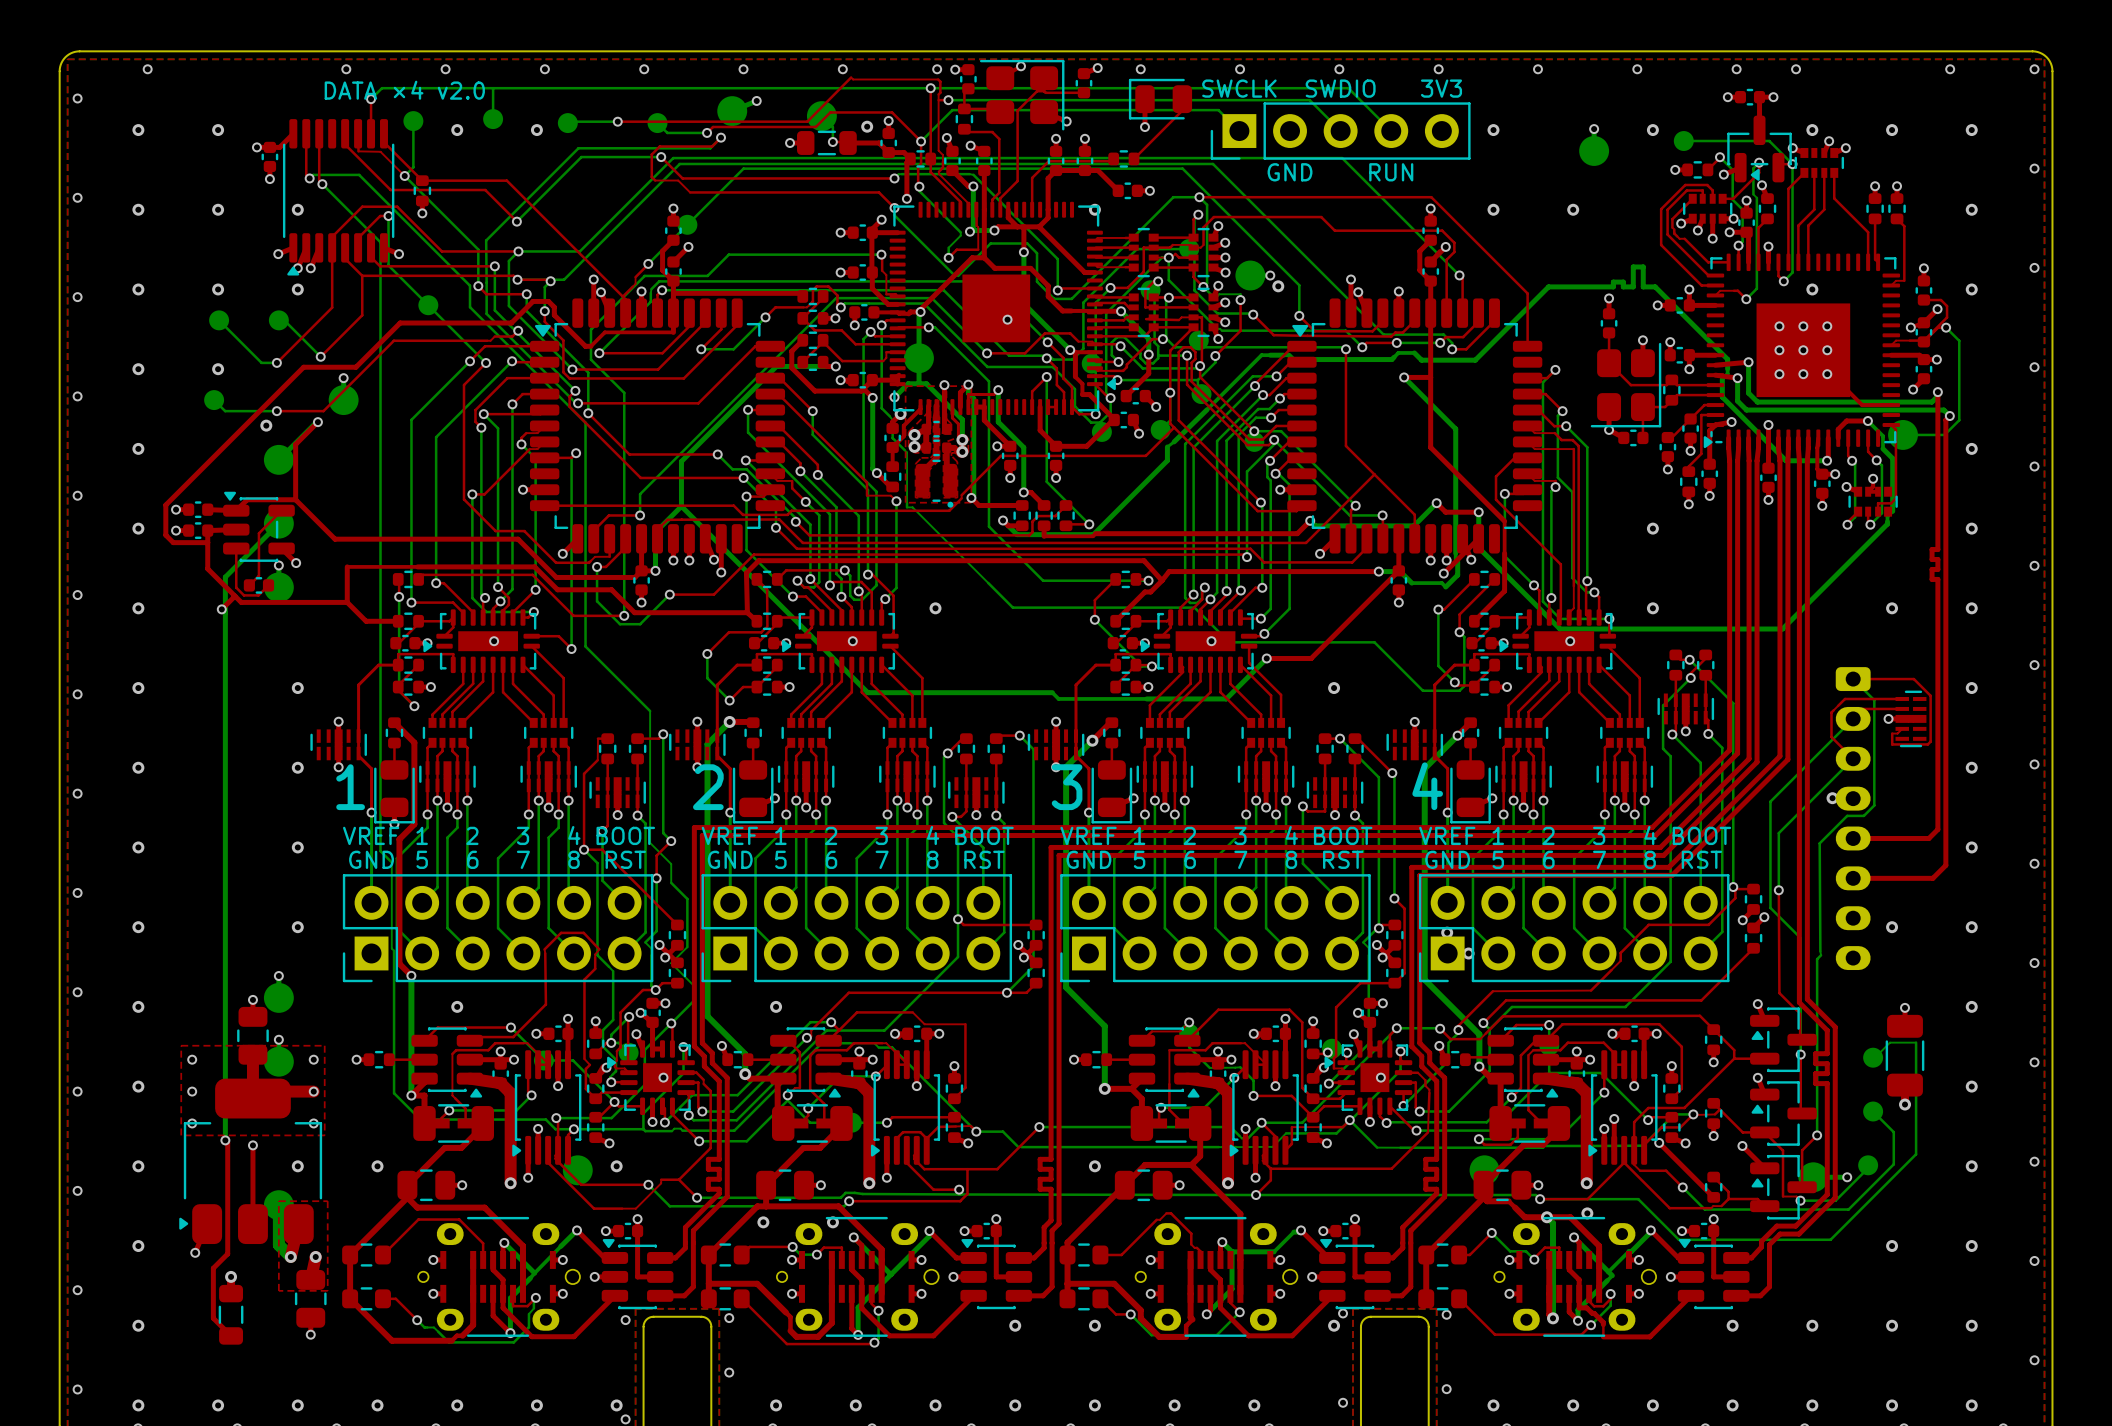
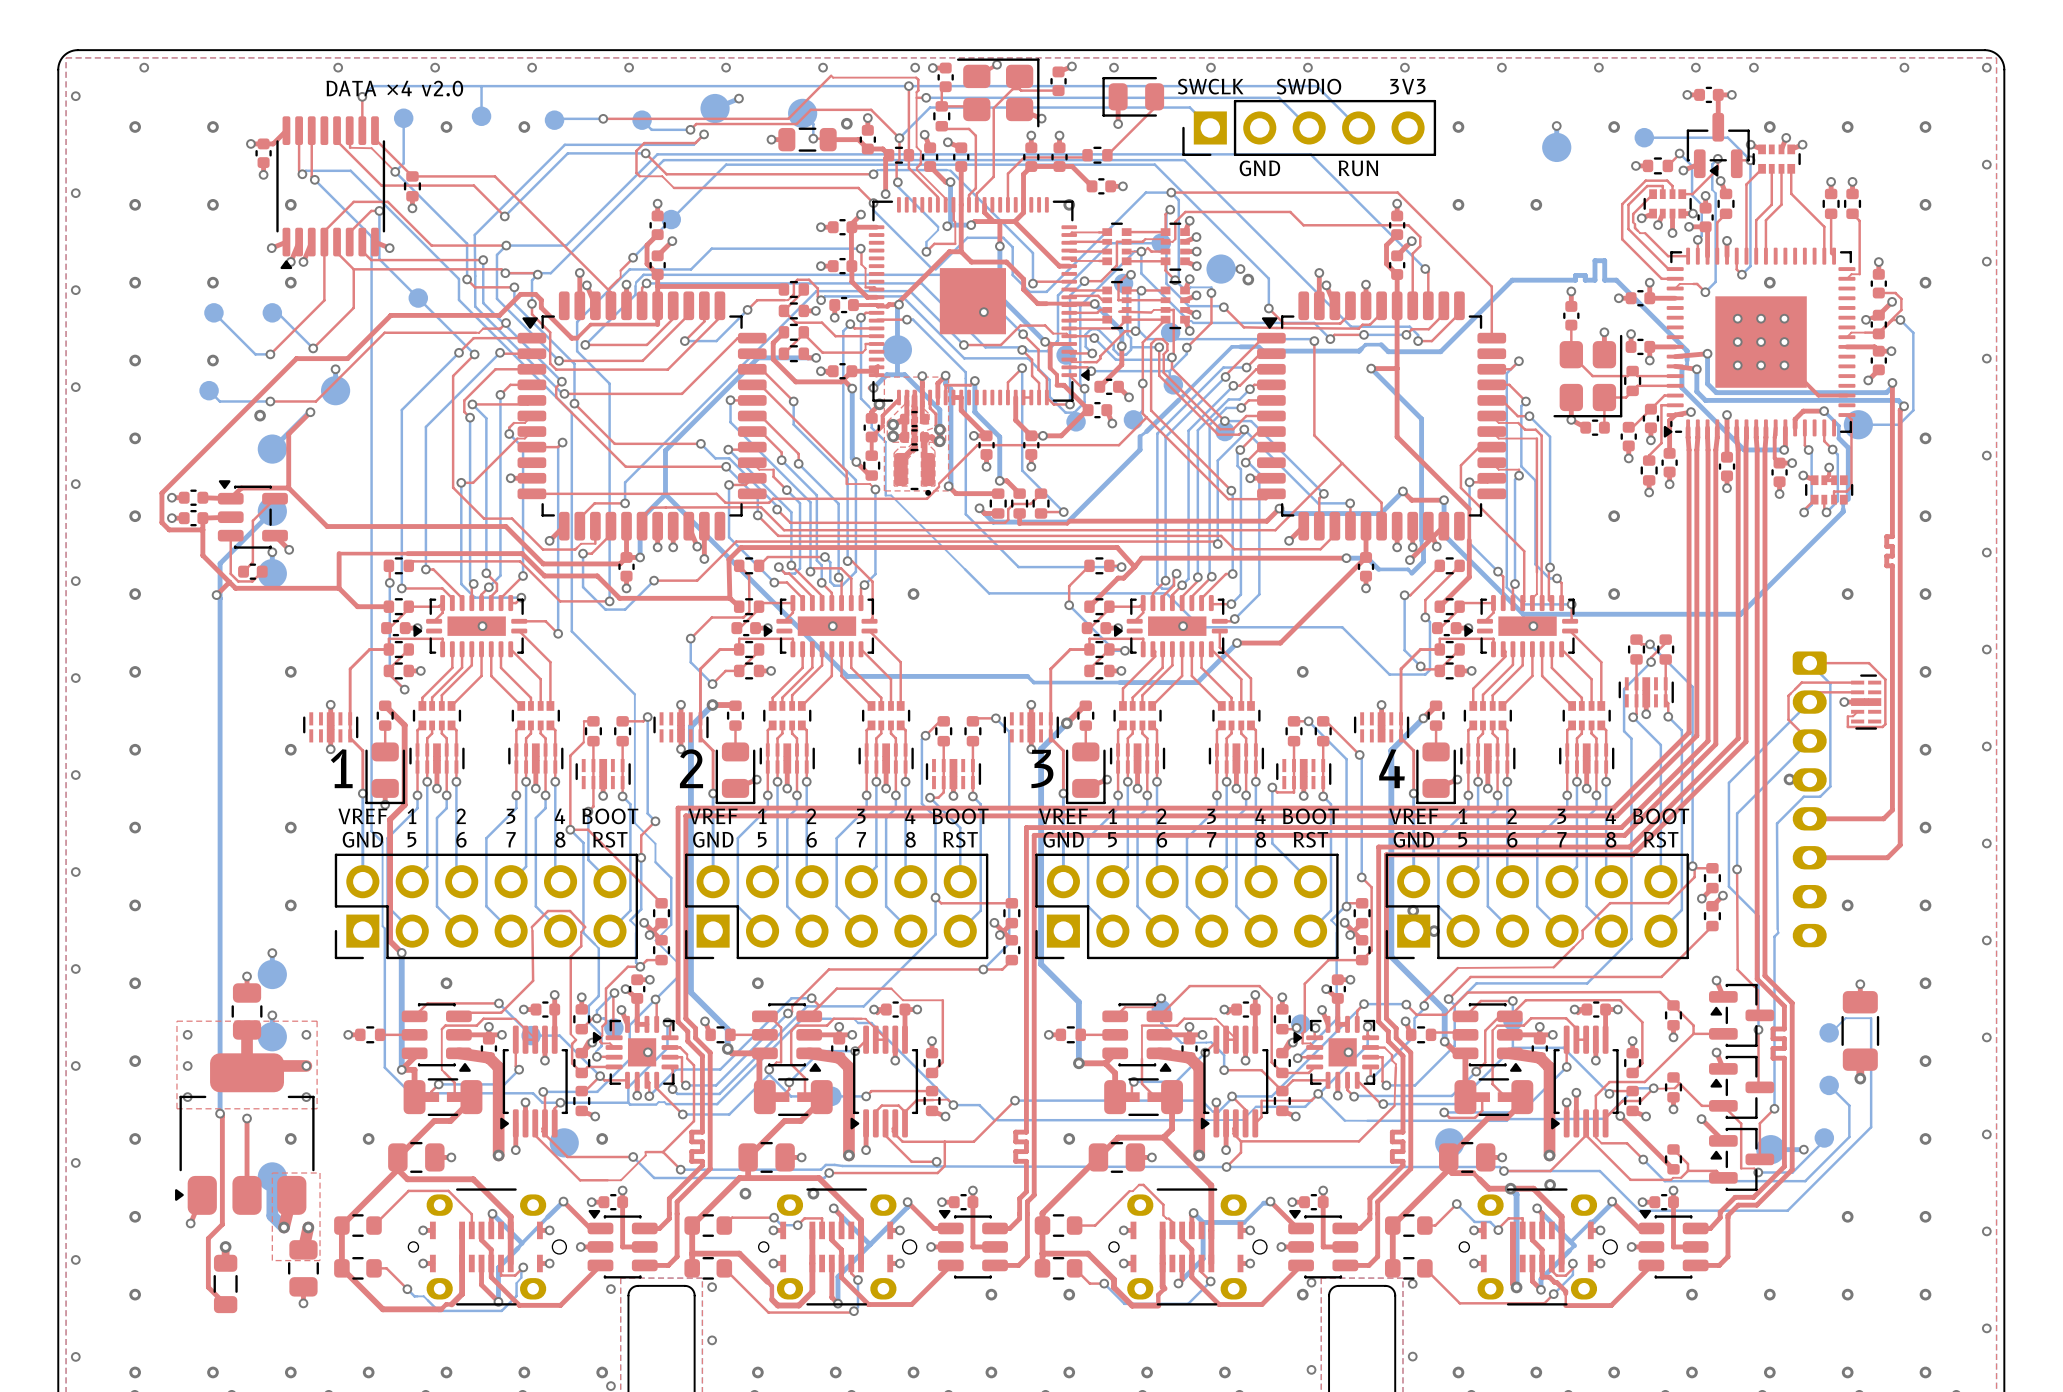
via: none -> (1042, 435)

